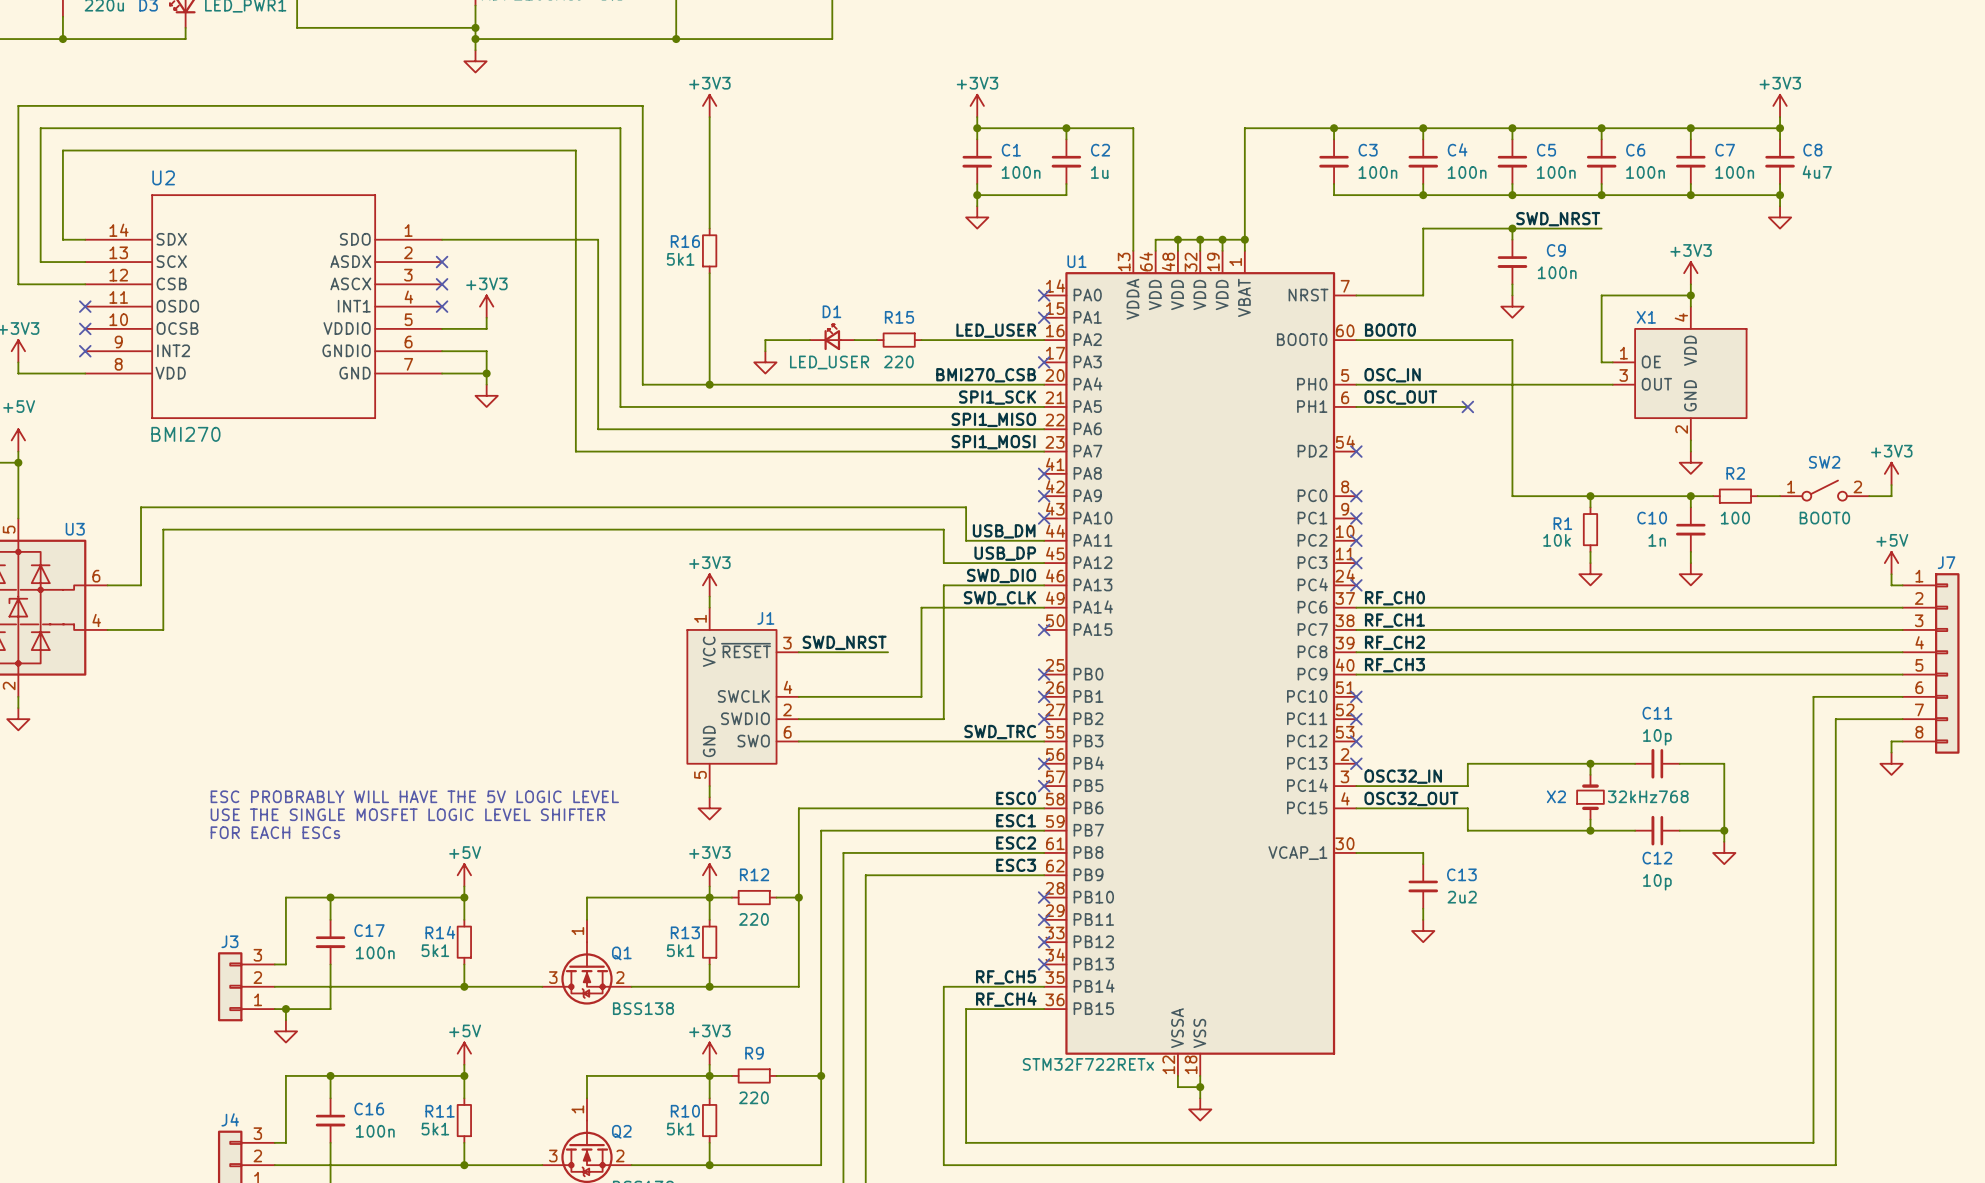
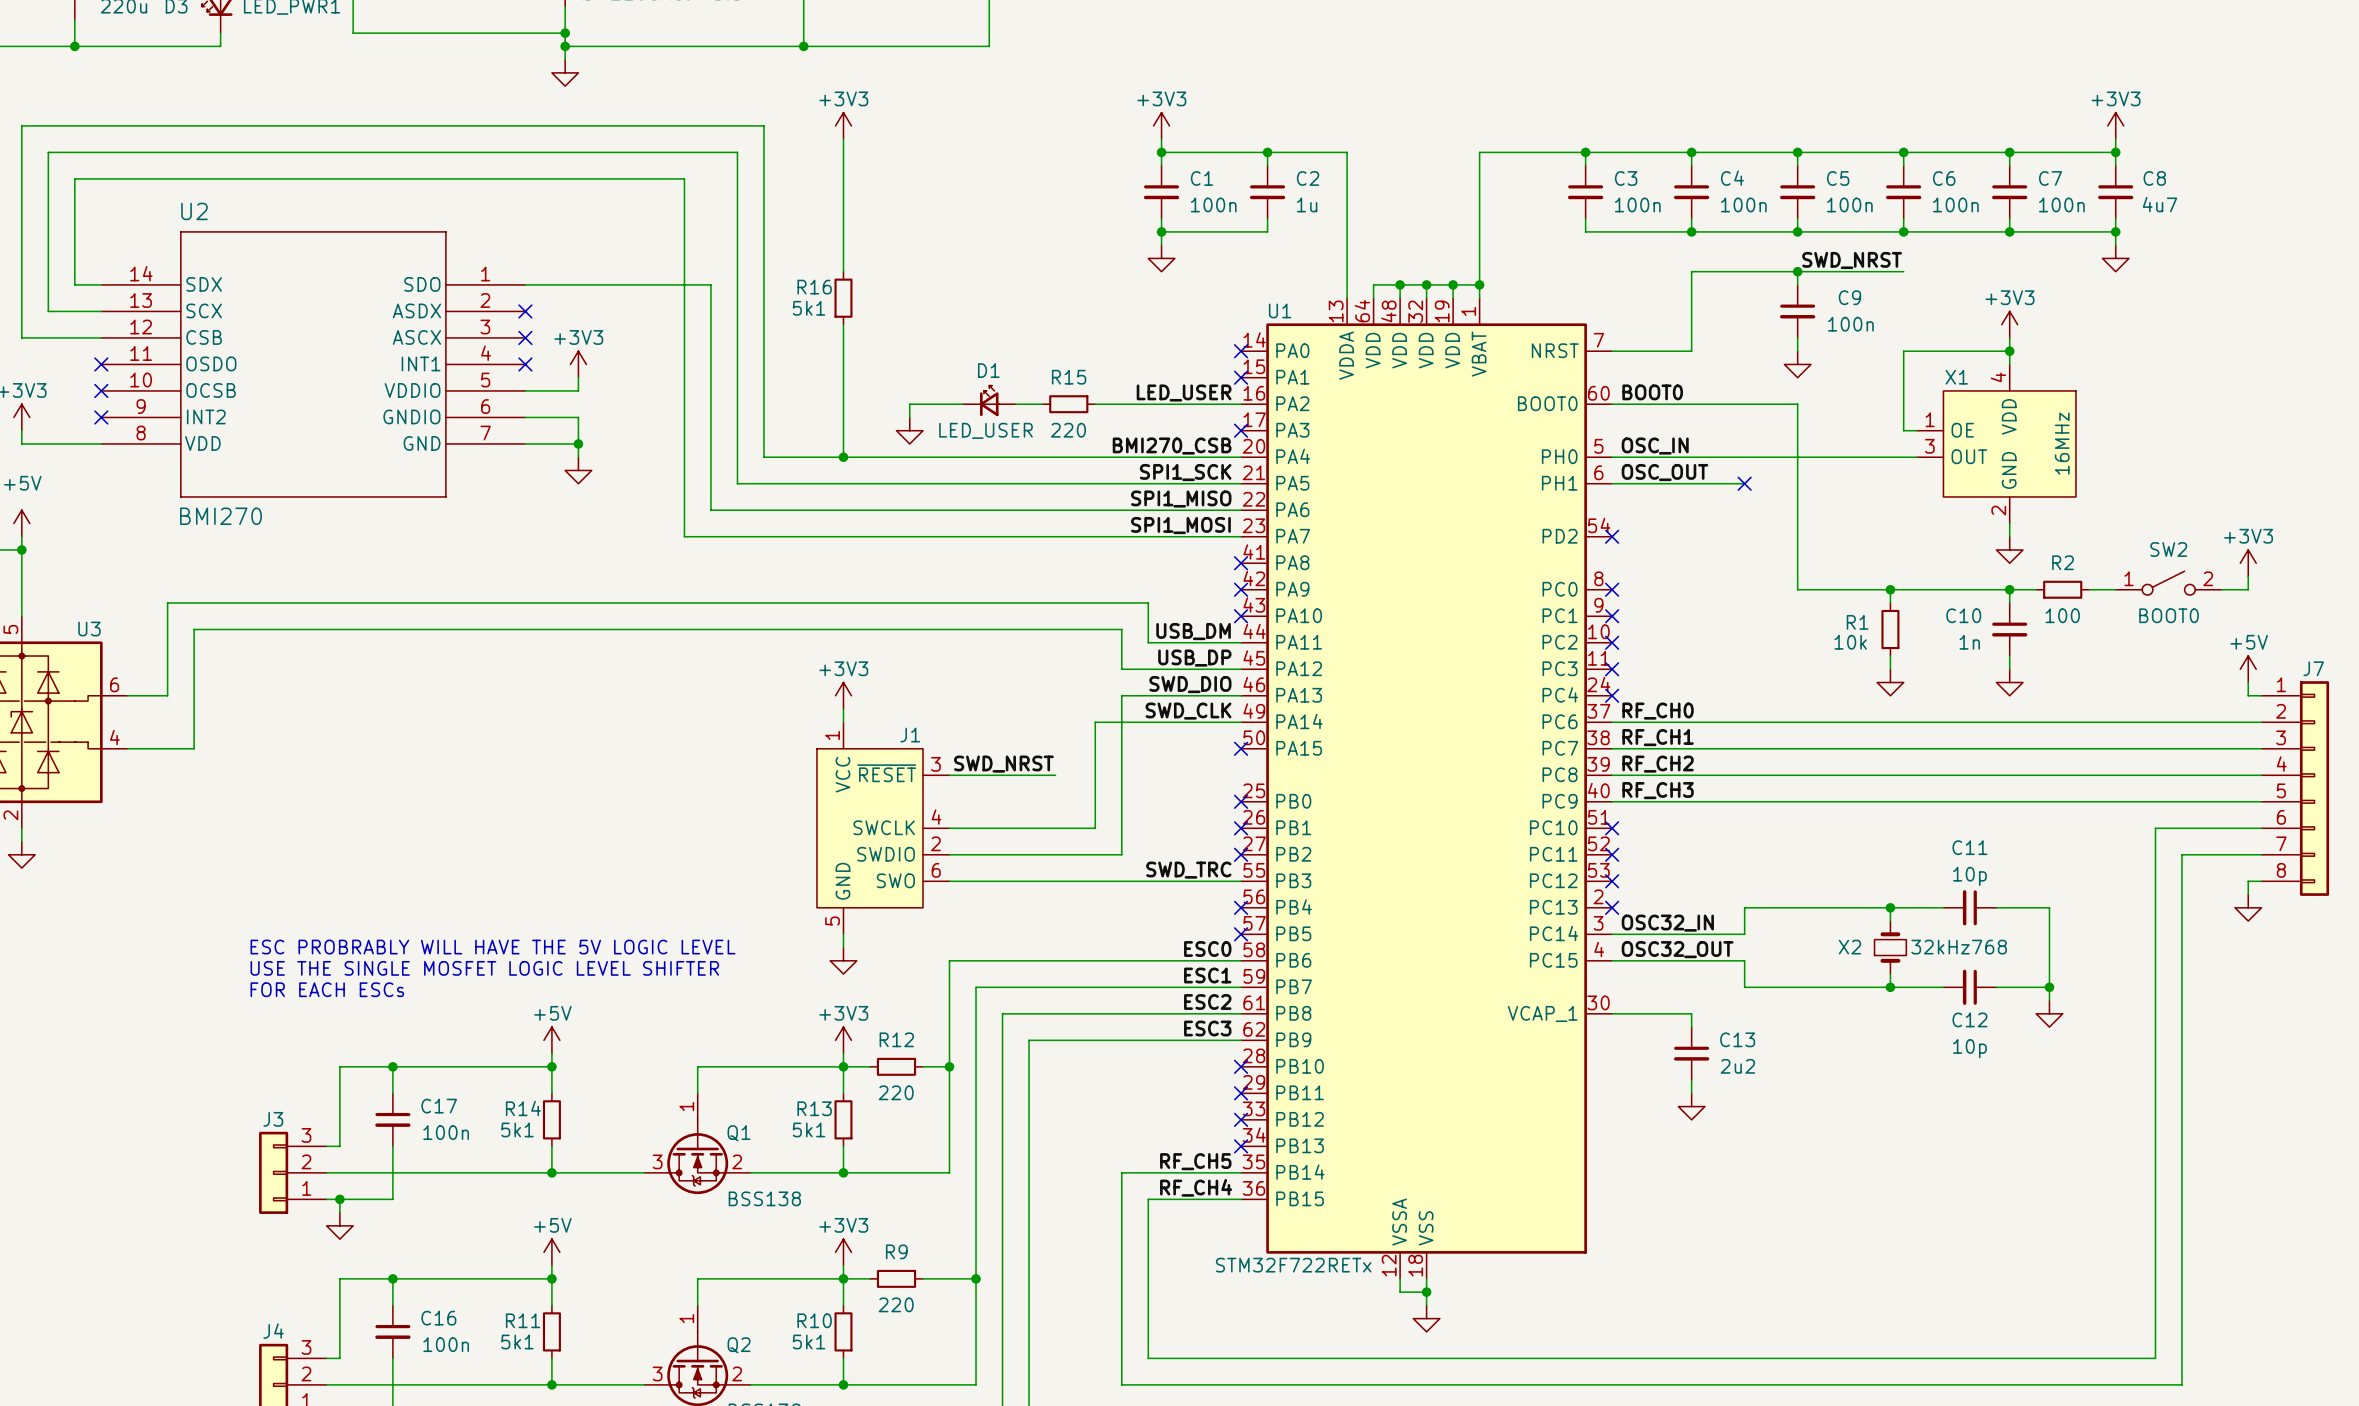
X1 value: none -> 16MHz (2062, 443)

